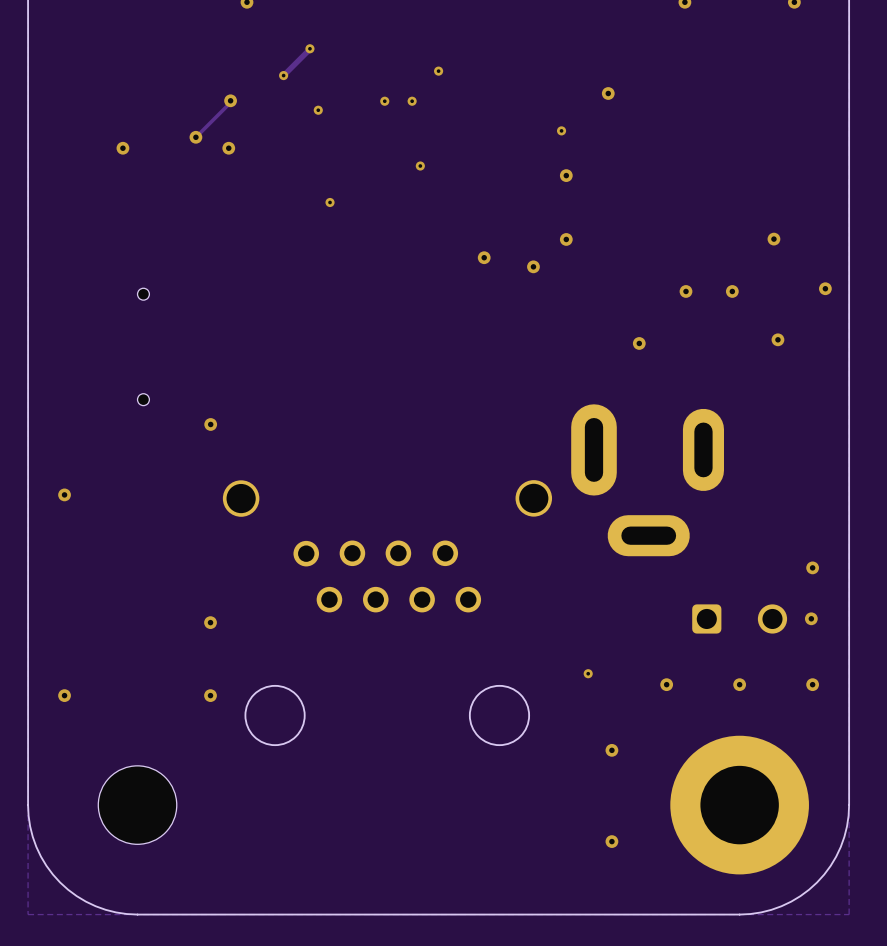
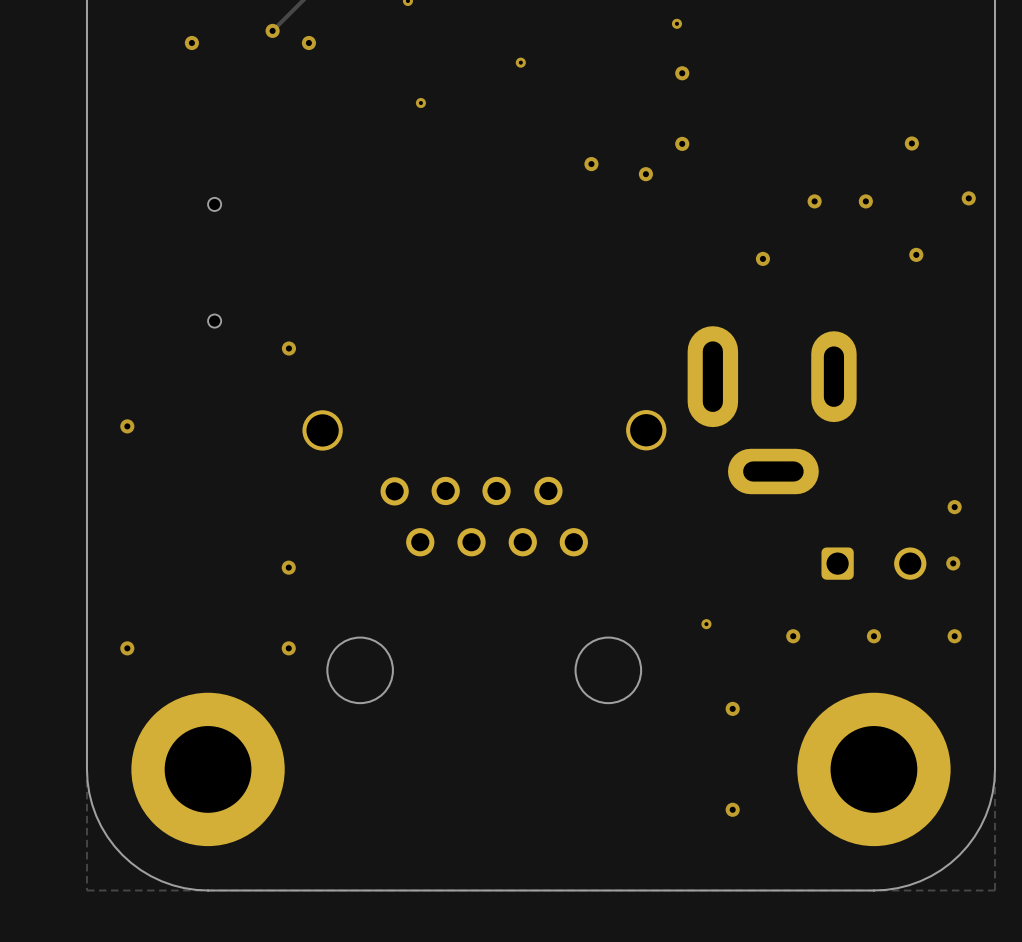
part footprint: [98, 765, 177, 845] -> [131, 692, 285, 847]

